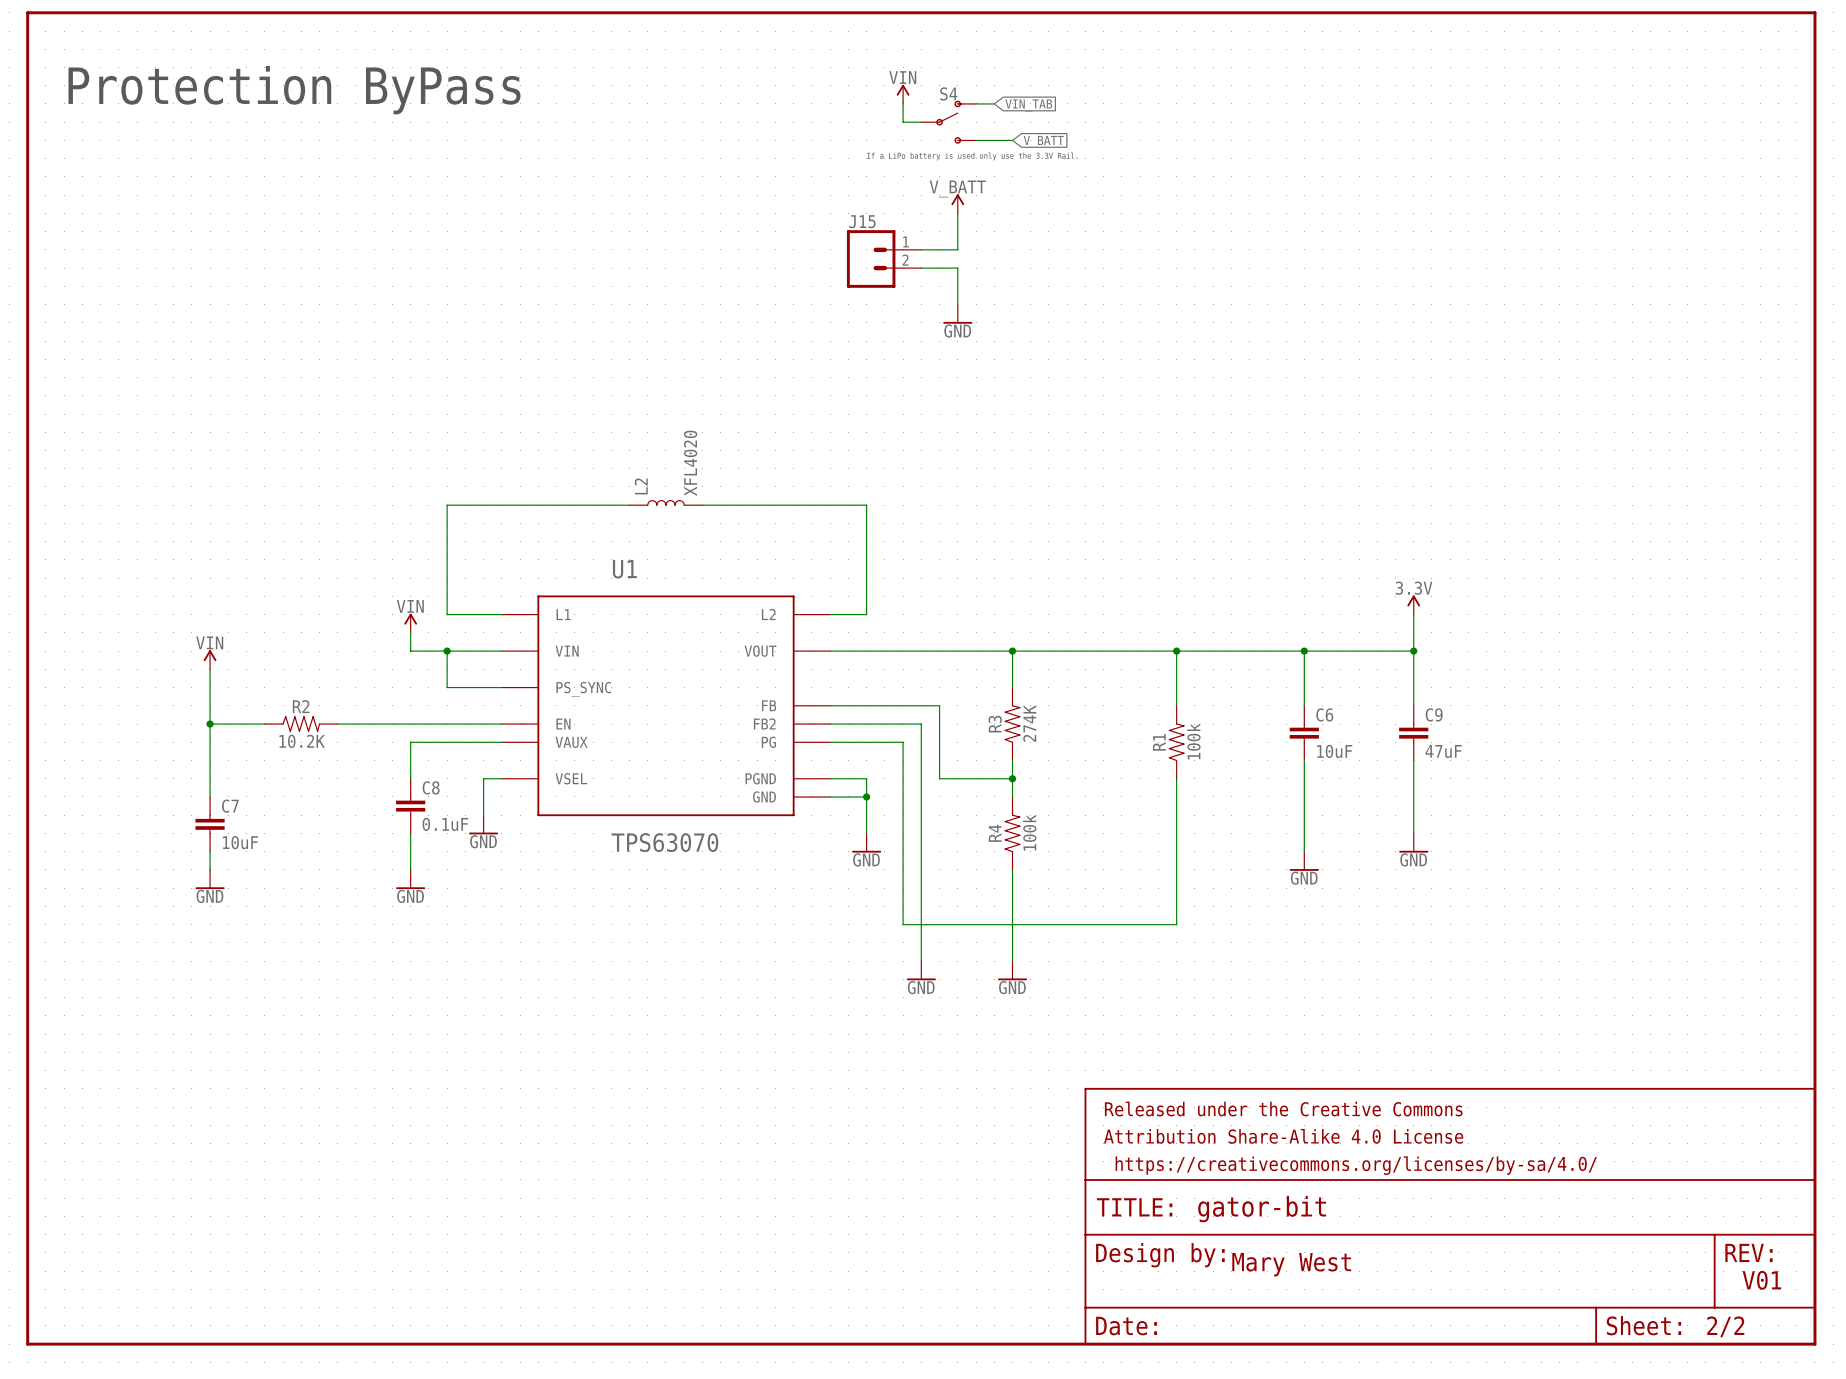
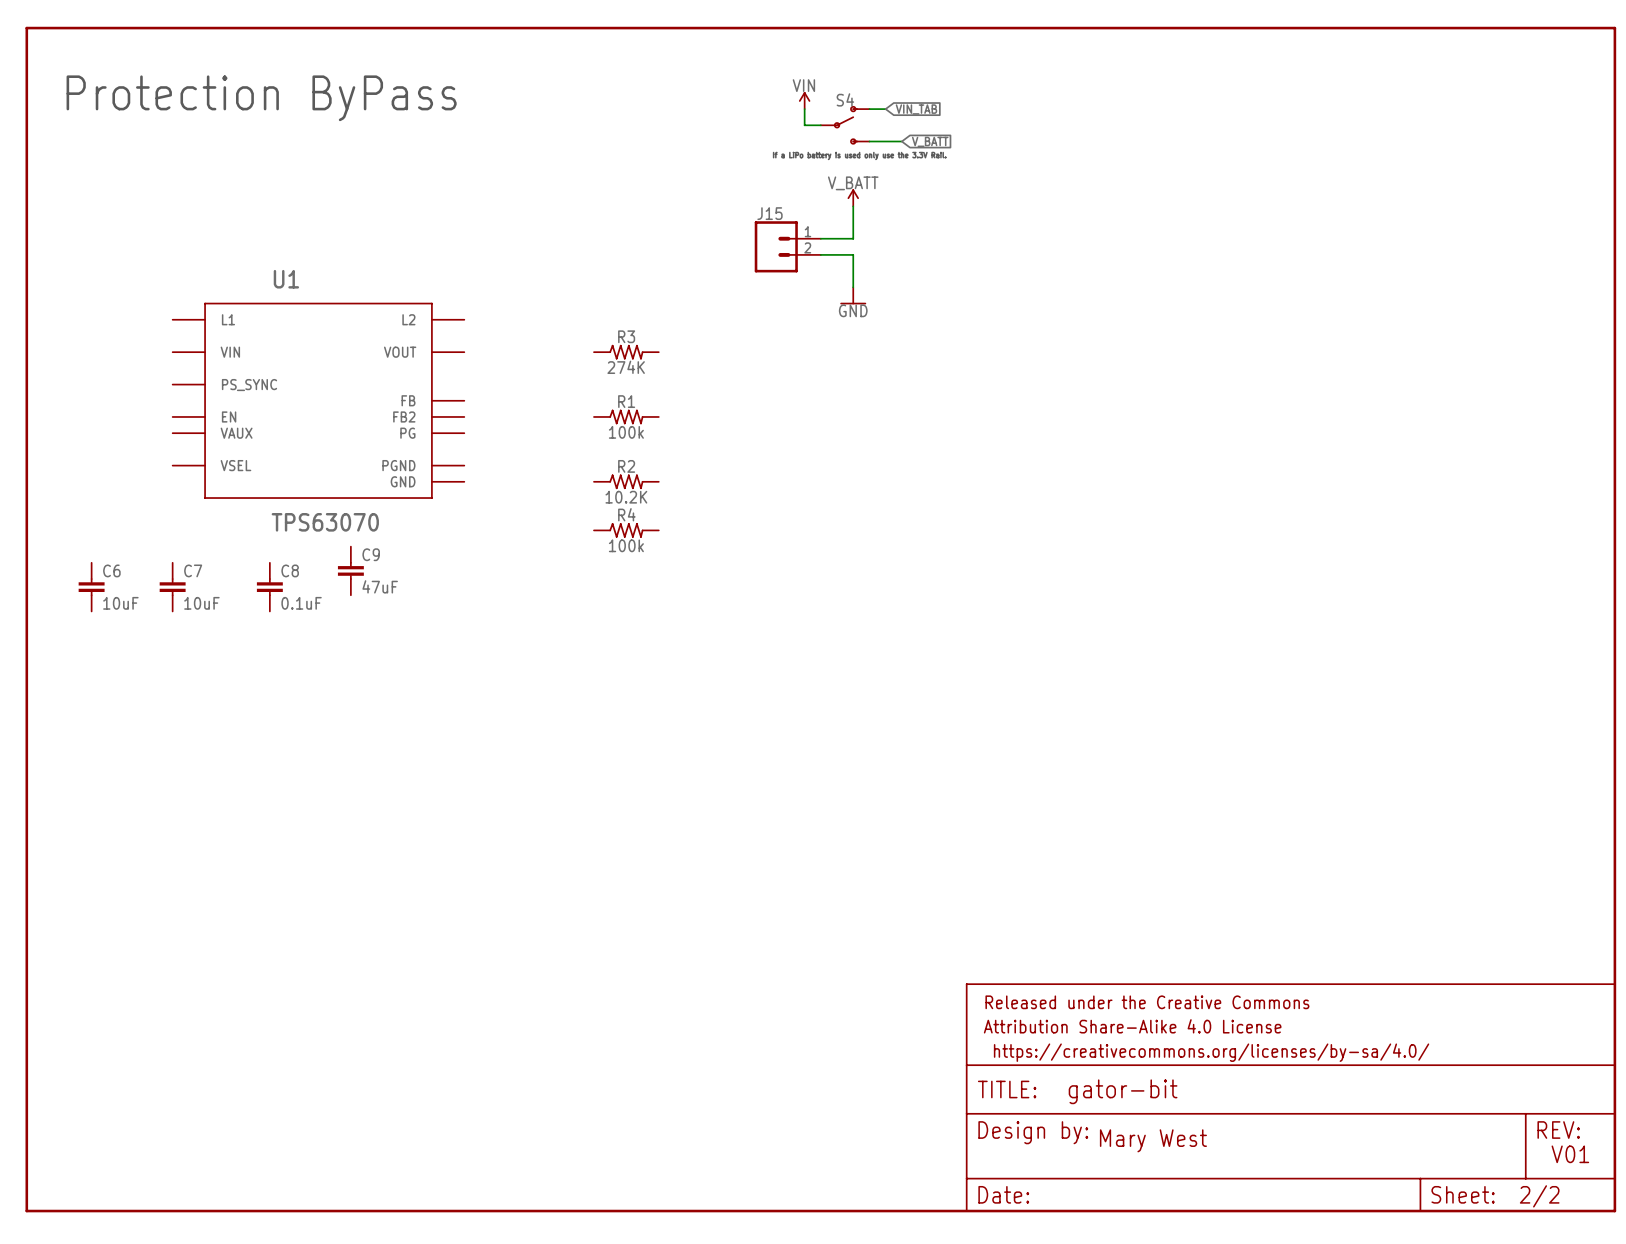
L2: XFL4020 (665, 502) -> none
wire: (629, 505) (447, 505) (447, 614) (501, 614) -> none
wire: (702, 505) (866, 505) (866, 614) (830, 614) -> none
power symbol: 3.3V (1413, 605) -> none
wire: (1413, 614) (1413, 705) -> none
power symbol: VIN (410, 623) -> none
wire: (410, 632) (410, 651) (501, 651) -> none
wire: (447, 651) (447, 687) (501, 687) -> none
junction: (447, 651) -> none
wire: (830, 651) (1413, 651) -> none
wire: (1012, 651) (1012, 687) -> none
junction: (1012, 651) -> none
wire: (1176, 651) (1176, 705) -> none
junction: (1176, 651) -> none
wire: (1304, 651) (1304, 705) -> none
junction: (1304, 651) -> none
junction: (1413, 651) -> none
power symbol: VIN (210, 659) -> none
wire: (210, 669) (210, 796) -> none
U1 position: (665, 705) -> (318, 400)
wire: (830, 705) (939, 705) (939, 778) (1012, 778) -> none
wire: (210, 724) (264, 724) -> none
junction: (210, 724) -> none
R2 position: (301, 724) -> (626, 481)
wire: (337, 724) (501, 724) -> none
wire: (830, 724) (921, 724) (921, 961) -> none
R3 rotation: 0° (1012, 724) -> 90° clockwise (626, 352)
R3 position: (1012, 724) -> (626, 352)
C6 position: (1304, 733) -> (91, 587)
C9 position: (1413, 733) -> (350, 570)
wire: (501, 742) (410, 742) (410, 778) -> none
wire: (830, 742) (903, 742) (903, 924) (1176, 924) (1176, 778) -> none
R1 rotation: 0° (1176, 742) -> 90° clockwise (626, 416)
R1 position: (1176, 742) -> (626, 416)
wire: (1012, 760) (1012, 796) -> none
wire: (1304, 760) (1304, 851) -> none
wire: (1413, 760) (1413, 833) -> none
wire: (501, 778) (483, 778) (483, 815) -> none
wire: (830, 778) (866, 778) (866, 833) -> none
junction: (1012, 778) -> none
wire: (830, 796) (866, 796) -> none
junction: (866, 796) -> none
C8 position: (410, 806) -> (269, 587)
C7 position: (210, 824) -> (172, 587)
power symbol: GND (483, 824) -> none
wire: (410, 833) (410, 869) -> none
R4 rotation: 0° (1012, 833) -> 90° clockwise (626, 530)
R4 position: (1012, 833) -> (626, 530)
power symbol: GND (866, 843) -> none
power symbol: GND (1413, 843) -> none
wire: (210, 851) (210, 869) -> none
power symbol: GND (1304, 861) -> none
wire: (1012, 869) (1012, 961) -> none
power symbol: GND (210, 879) -> none
power symbol: GND (410, 879) -> none
power symbol: GND (921, 970) -> none
power symbol: GND (1012, 970) -> none

